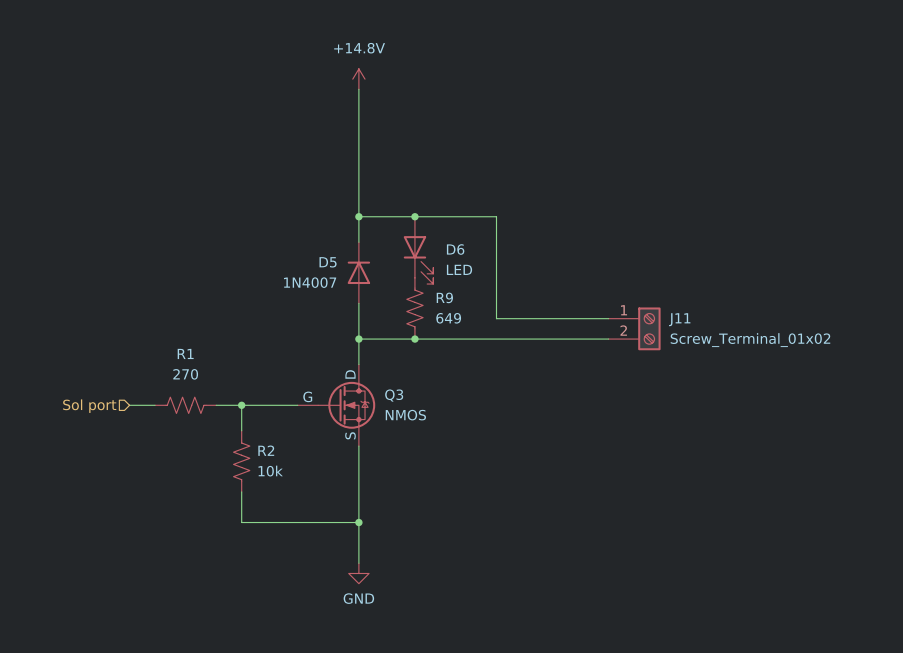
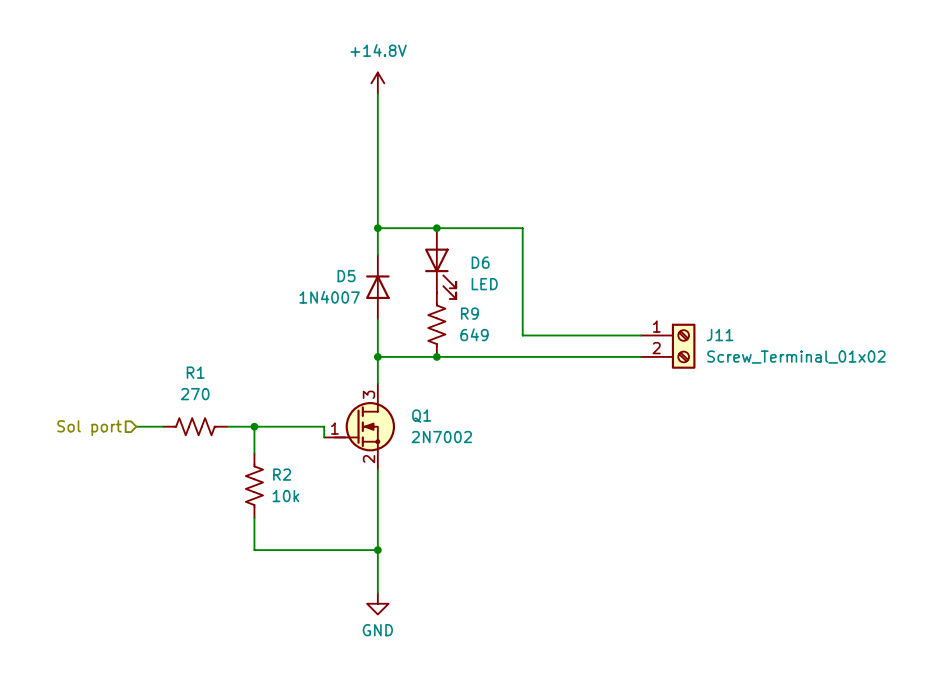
wire: none -> (313, 426) (324, 426) (324, 437)
Q3: NMOS (336, 405) -> none
Q1: none -> 2N7002 (359, 426)

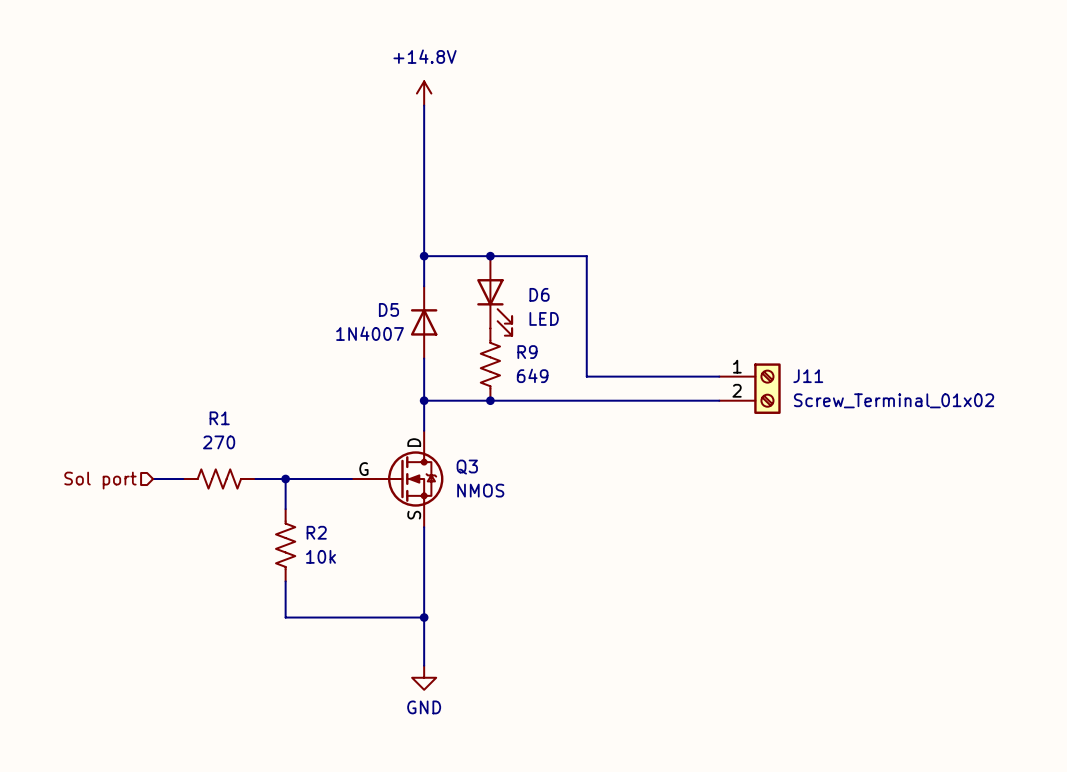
wire: (313, 426) (324, 426) (324, 437) -> none
Q3: none -> NMOS (397, 479)
Q1: 2N7002 (359, 426) -> none

